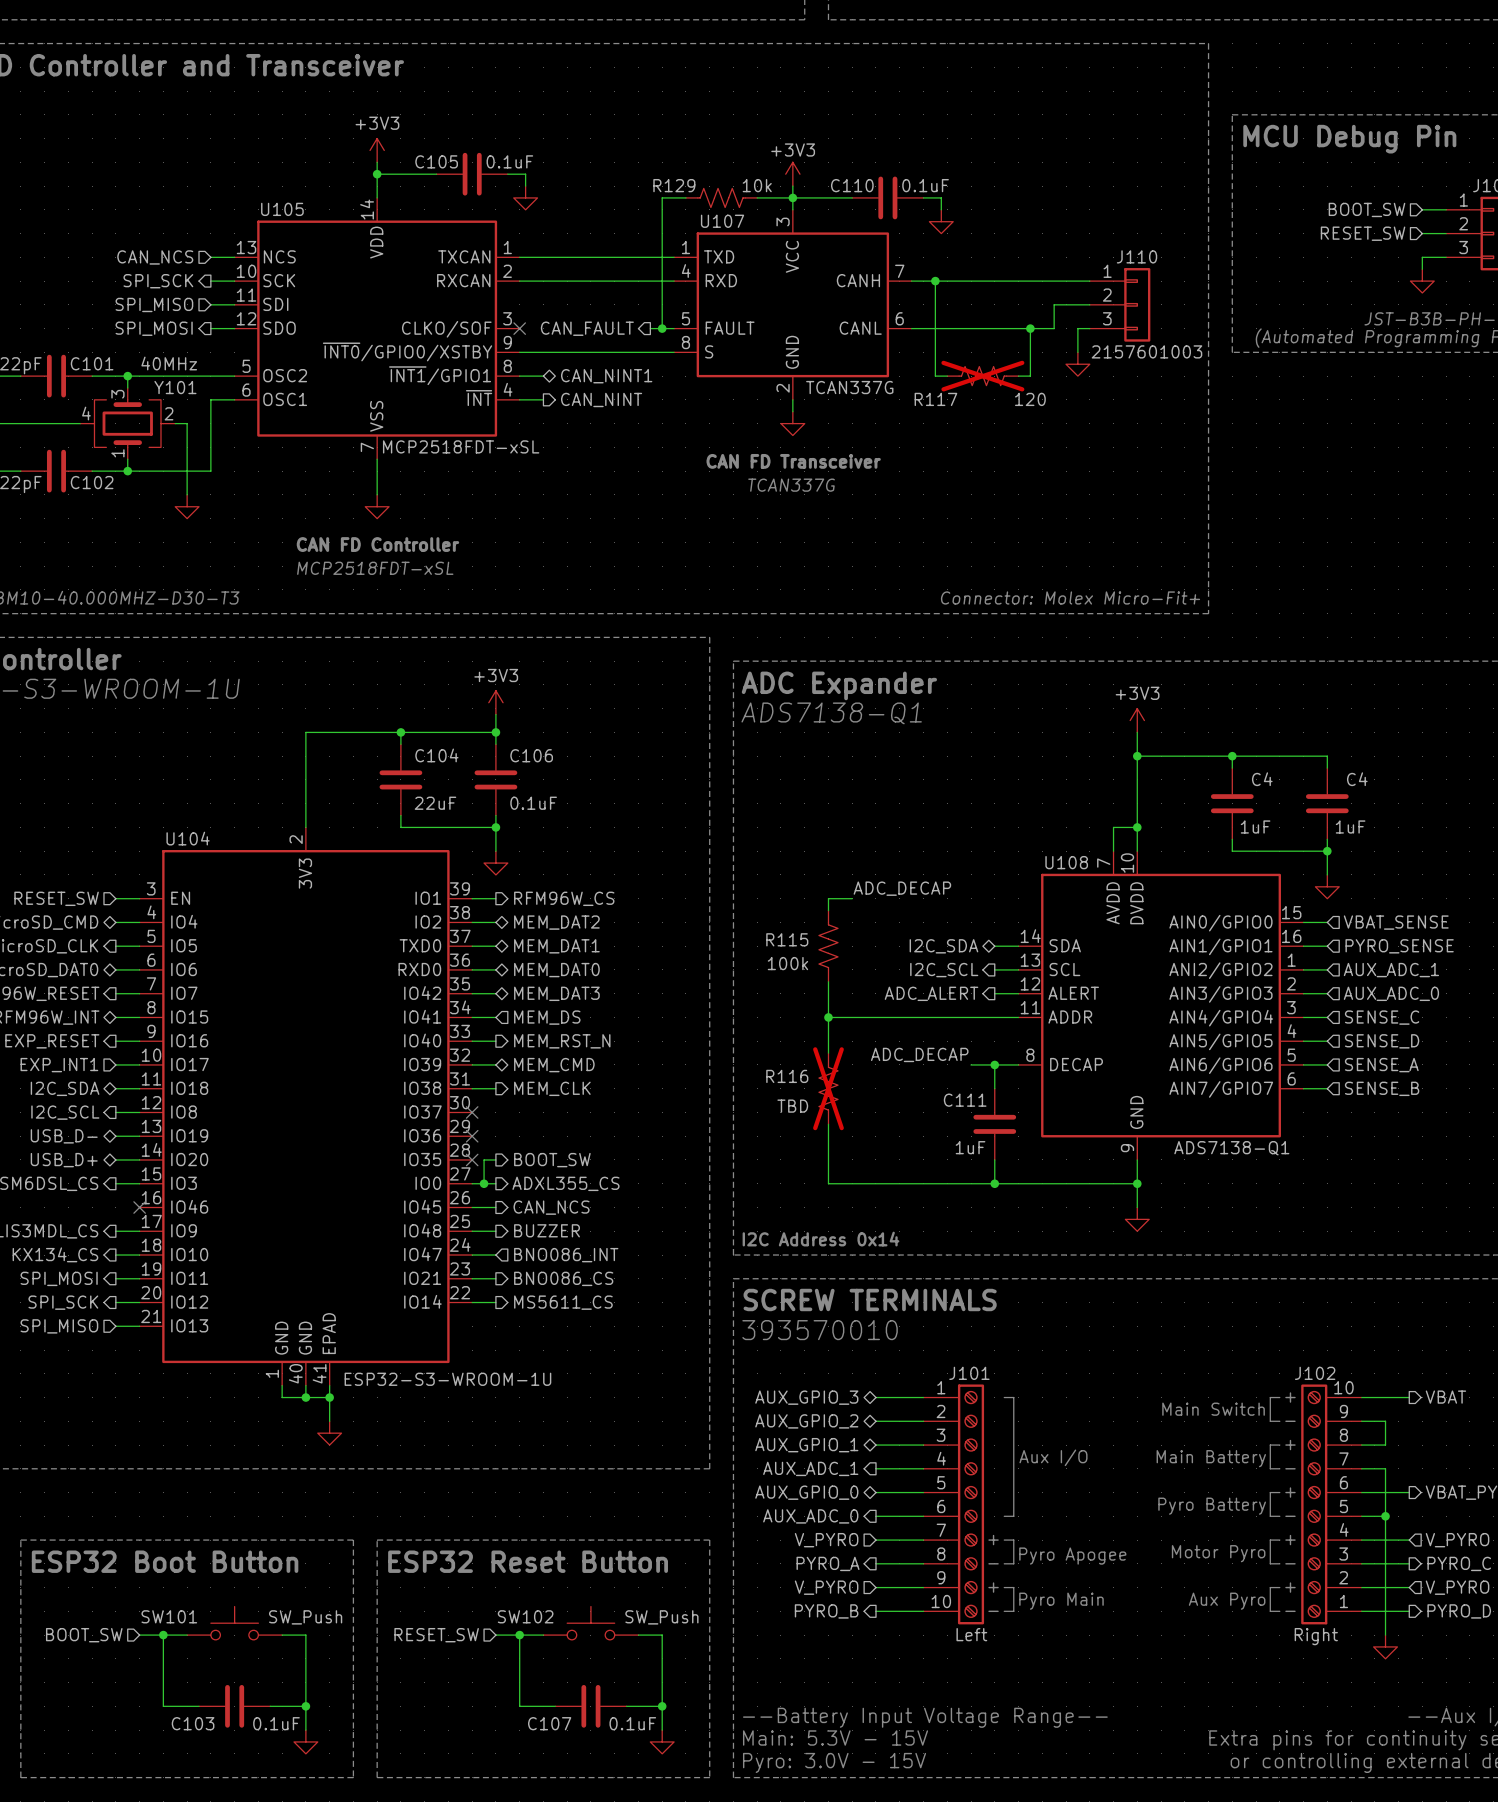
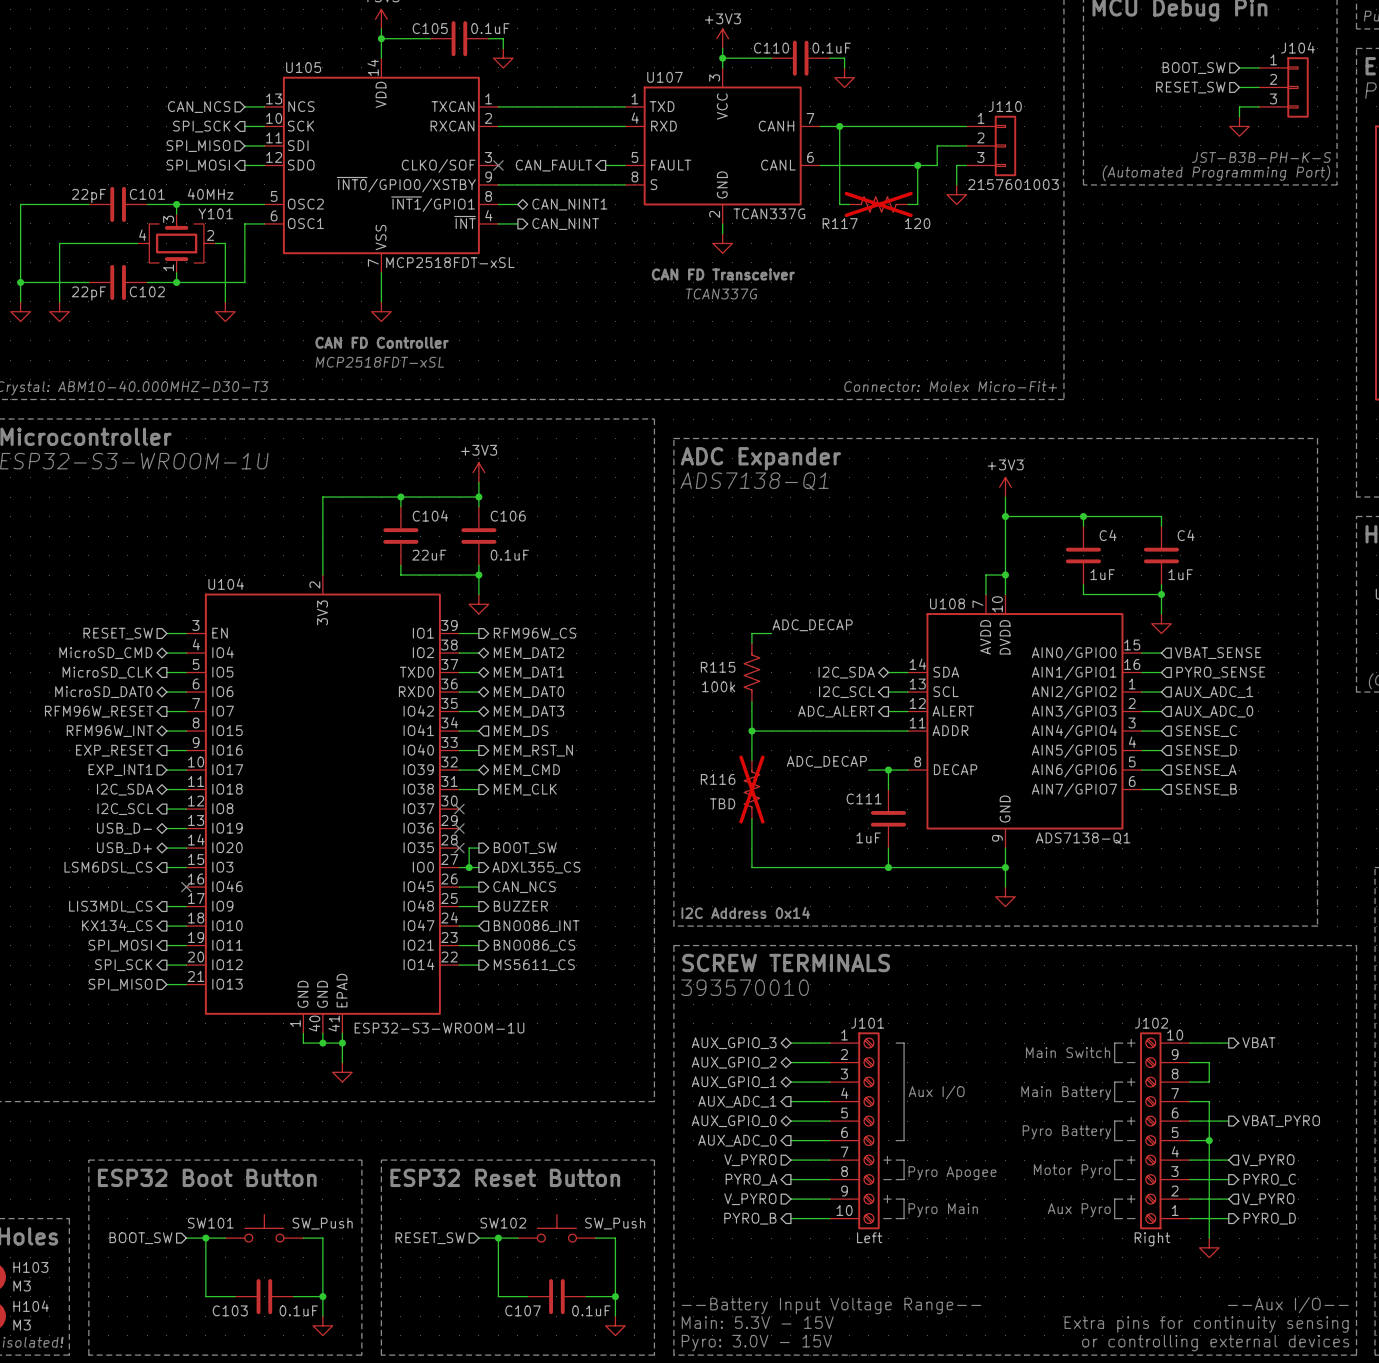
wire: (685, 197) (662, 197) (662, 328) -> none
R129: 10k (721, 197) -> none
wire: (757, 197) (792, 197) -> none
junction: (662, 328) -> none

